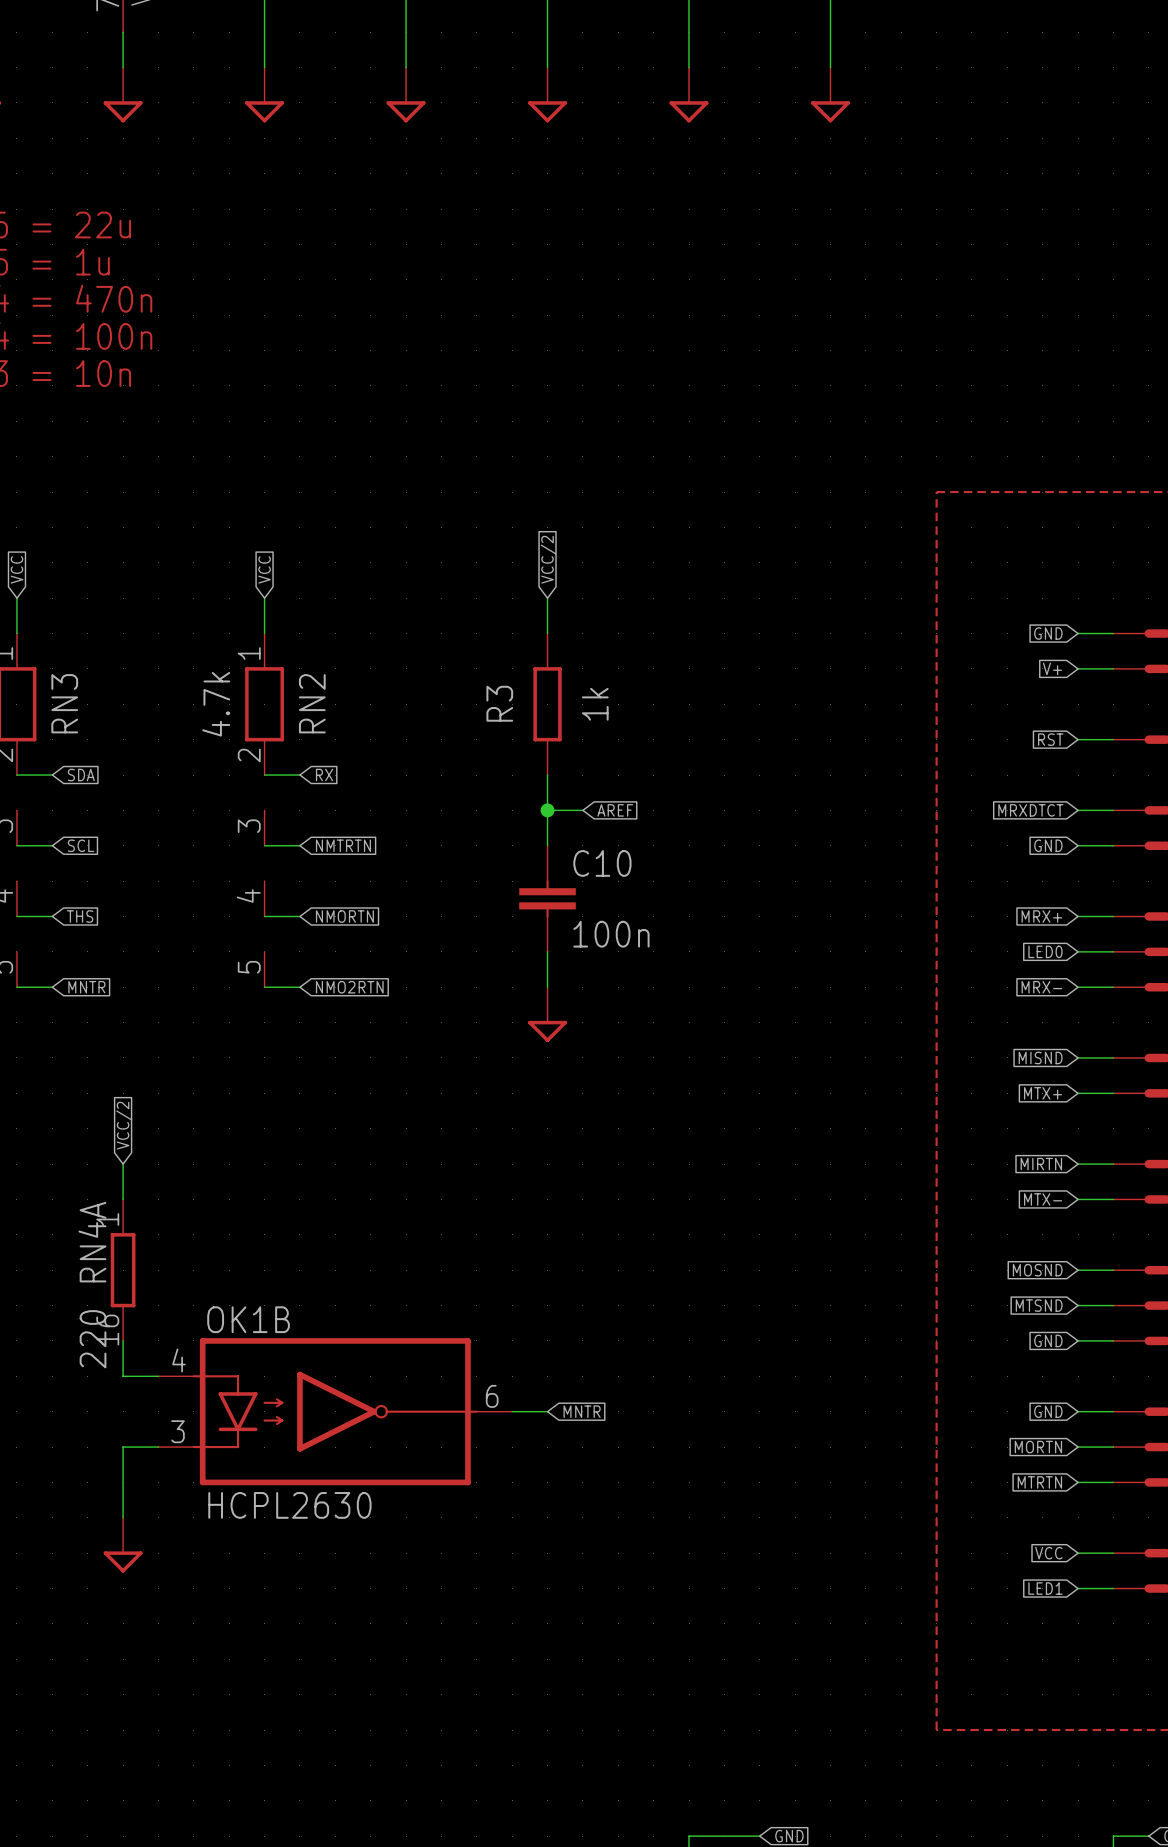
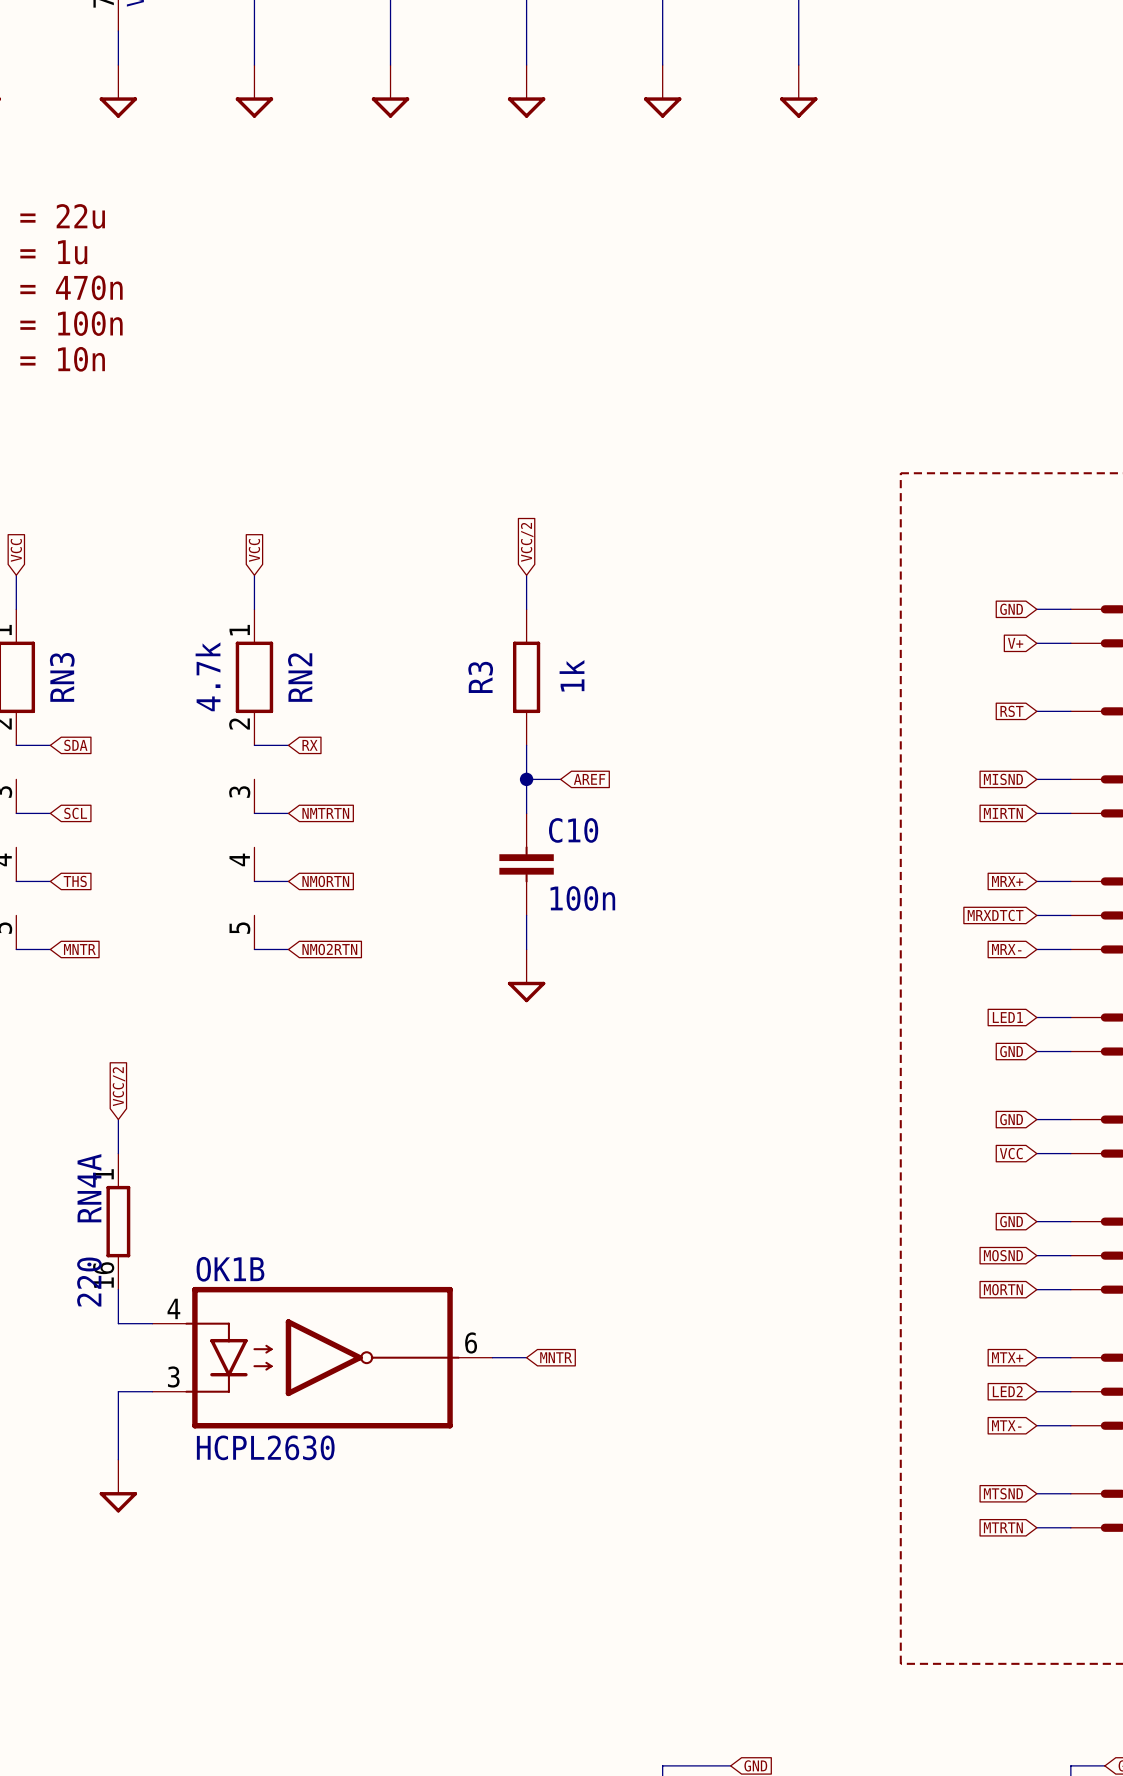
global label: MRXDTCT (1030, 810) -> MISND (1003, 779)
global label: GND (1048, 845) -> MIRTN (1003, 813)
global label: LED0 (1045, 951) -> MRXDTCT (995, 915)
global label: MISND (1040, 1057) -> LED1 (1007, 1017)
global label: MTX+ (1043, 1093) -> GND (1011, 1051)
global label: MIRTN (1041, 1164) -> GND (1011, 1119)
global label: MTX- (1043, 1199) -> VCC (1011, 1153)
global label: MOSND (1037, 1270) -> GND (1011, 1221)
global label: MTSND (1039, 1305) -> MOSND (1003, 1255)
global label: GND (1048, 1340) -> MORTN (1003, 1289)
global label: GND (1048, 1411) -> MTX+ (1007, 1357)
global label: MORTN (1038, 1447) -> LED2 (1007, 1391)
global label: MTRTN (1039, 1482) -> MTX- (1006, 1425)
global label: VCC (1048, 1553) -> MTSND (1003, 1493)
global label: LED1 (1045, 1588) -> MTRTN (1003, 1527)

